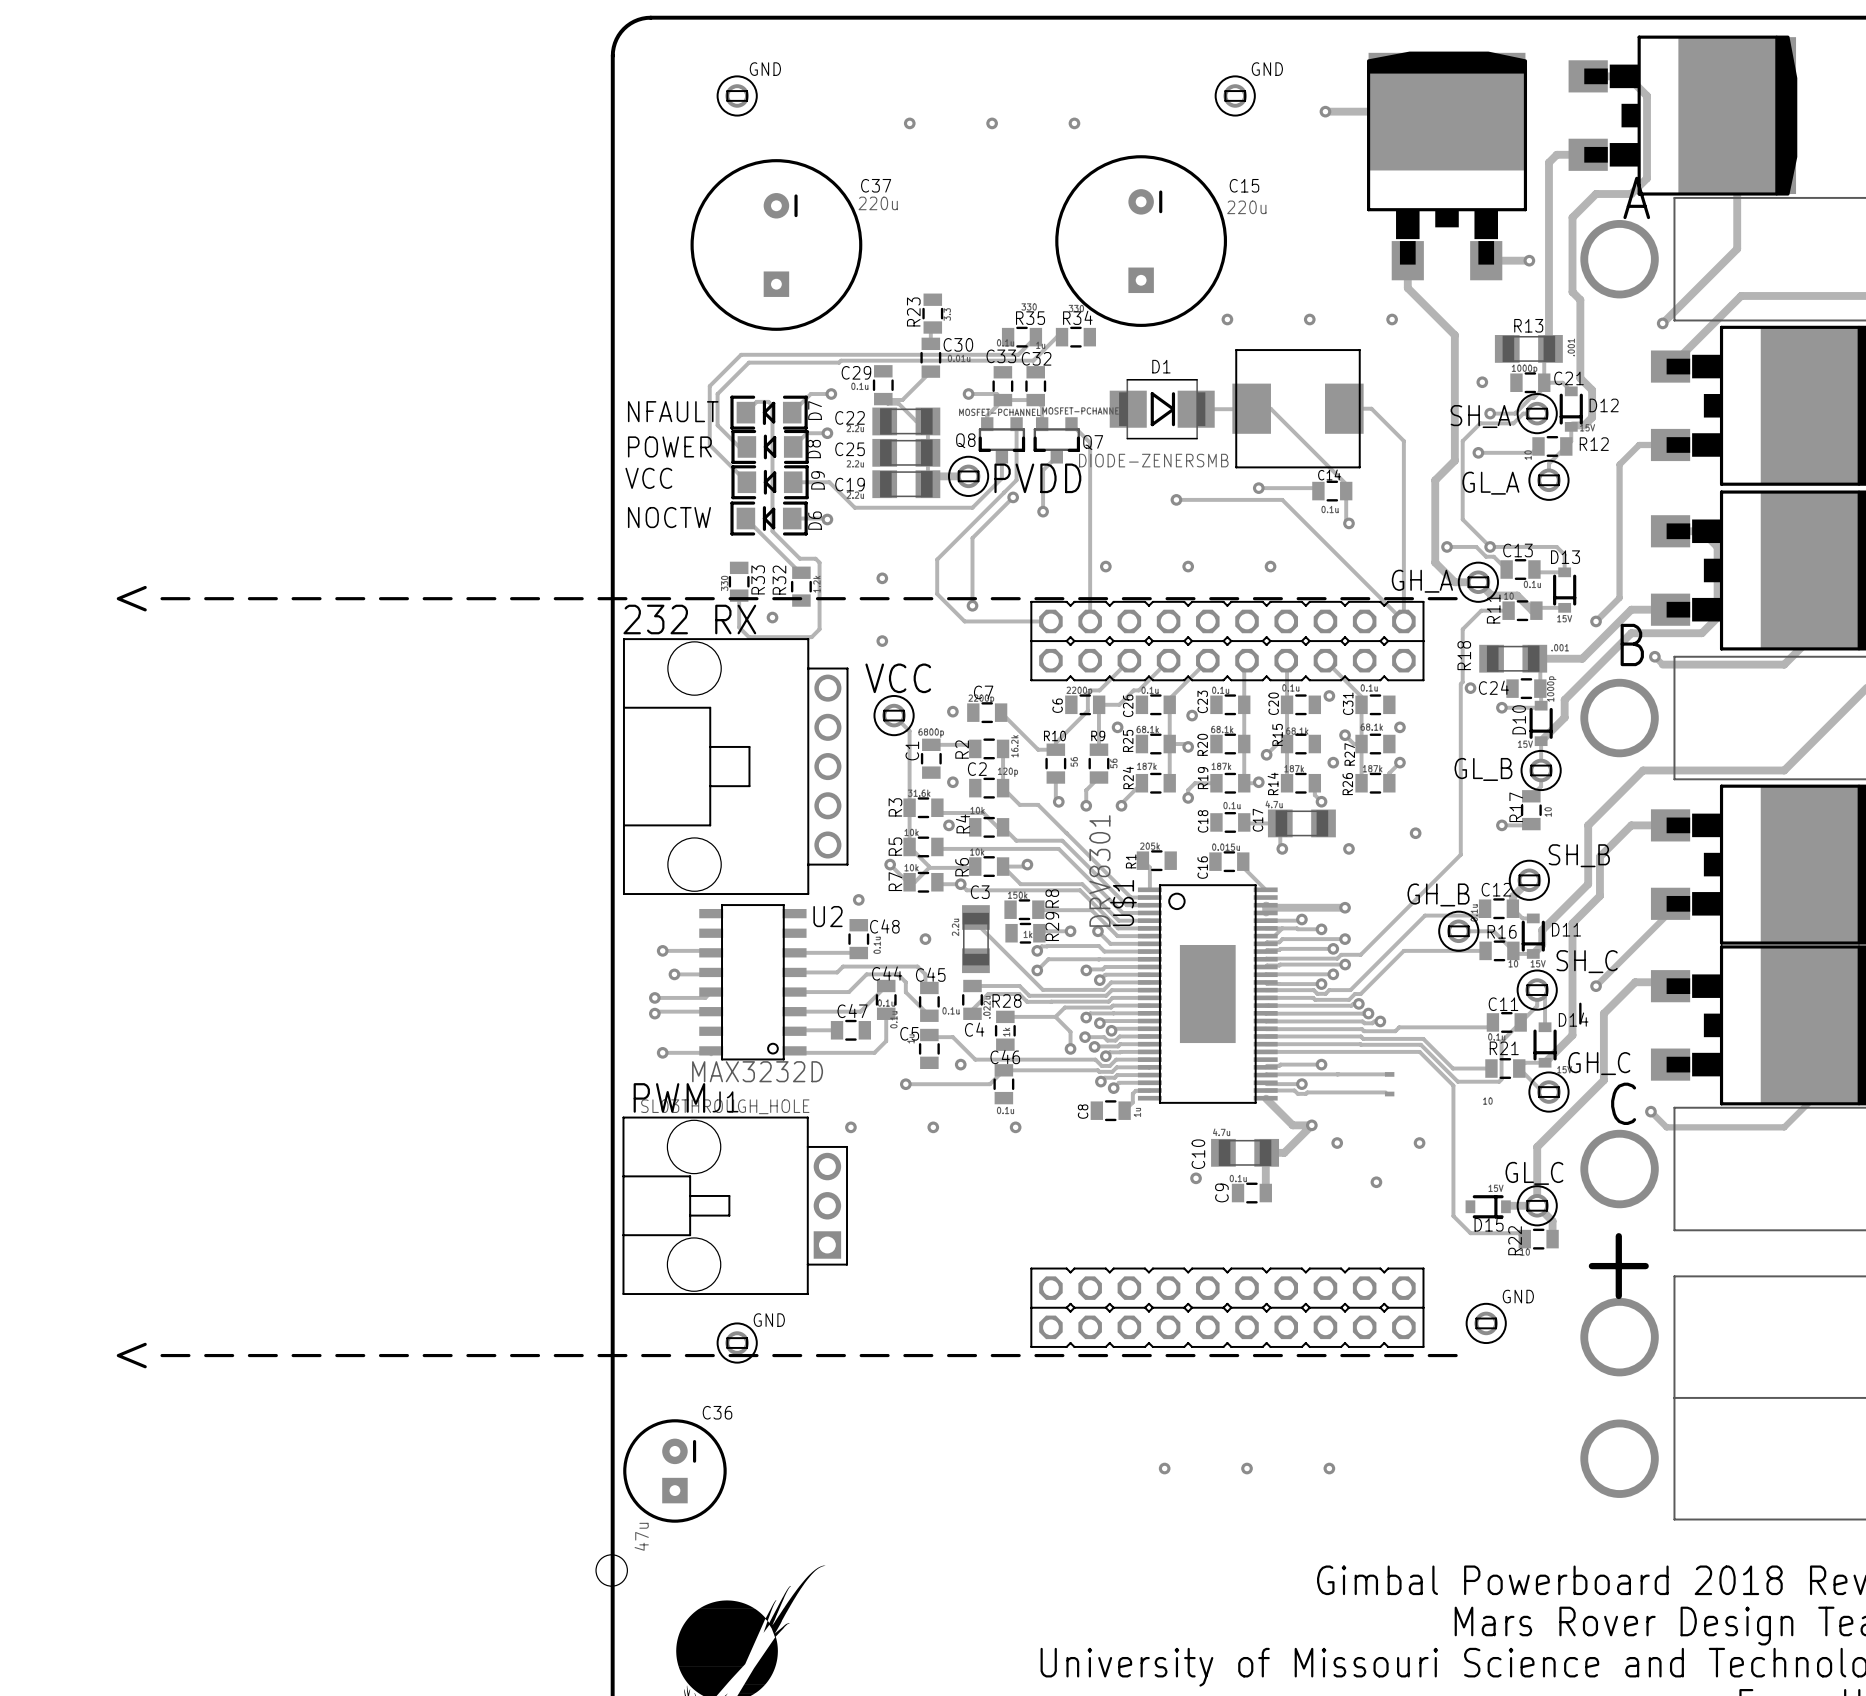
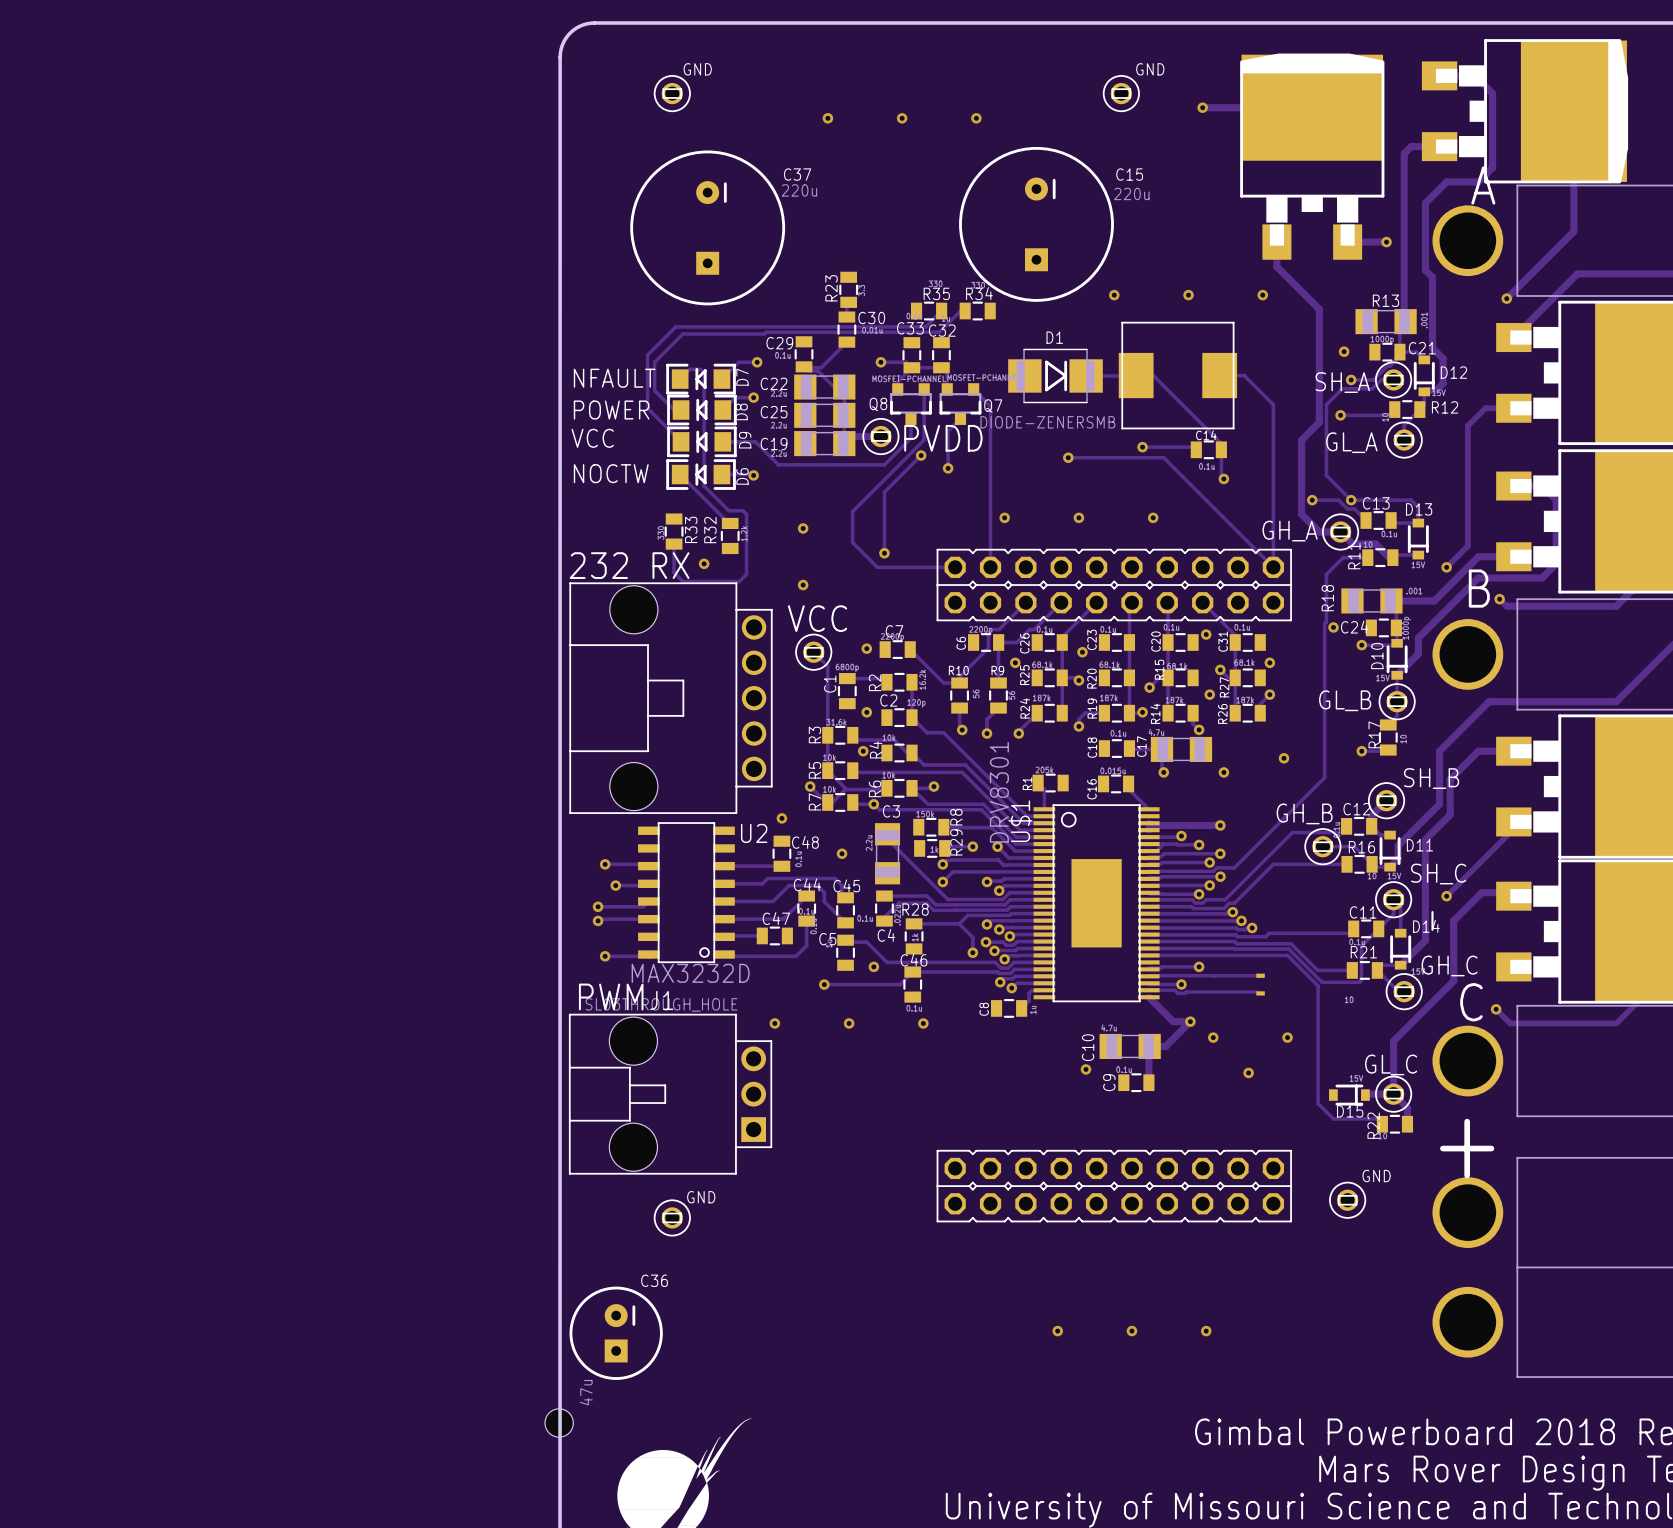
text: <------------------------------ (787, 598) -> none
text: <------------------------------ (787, 1355) -> none

